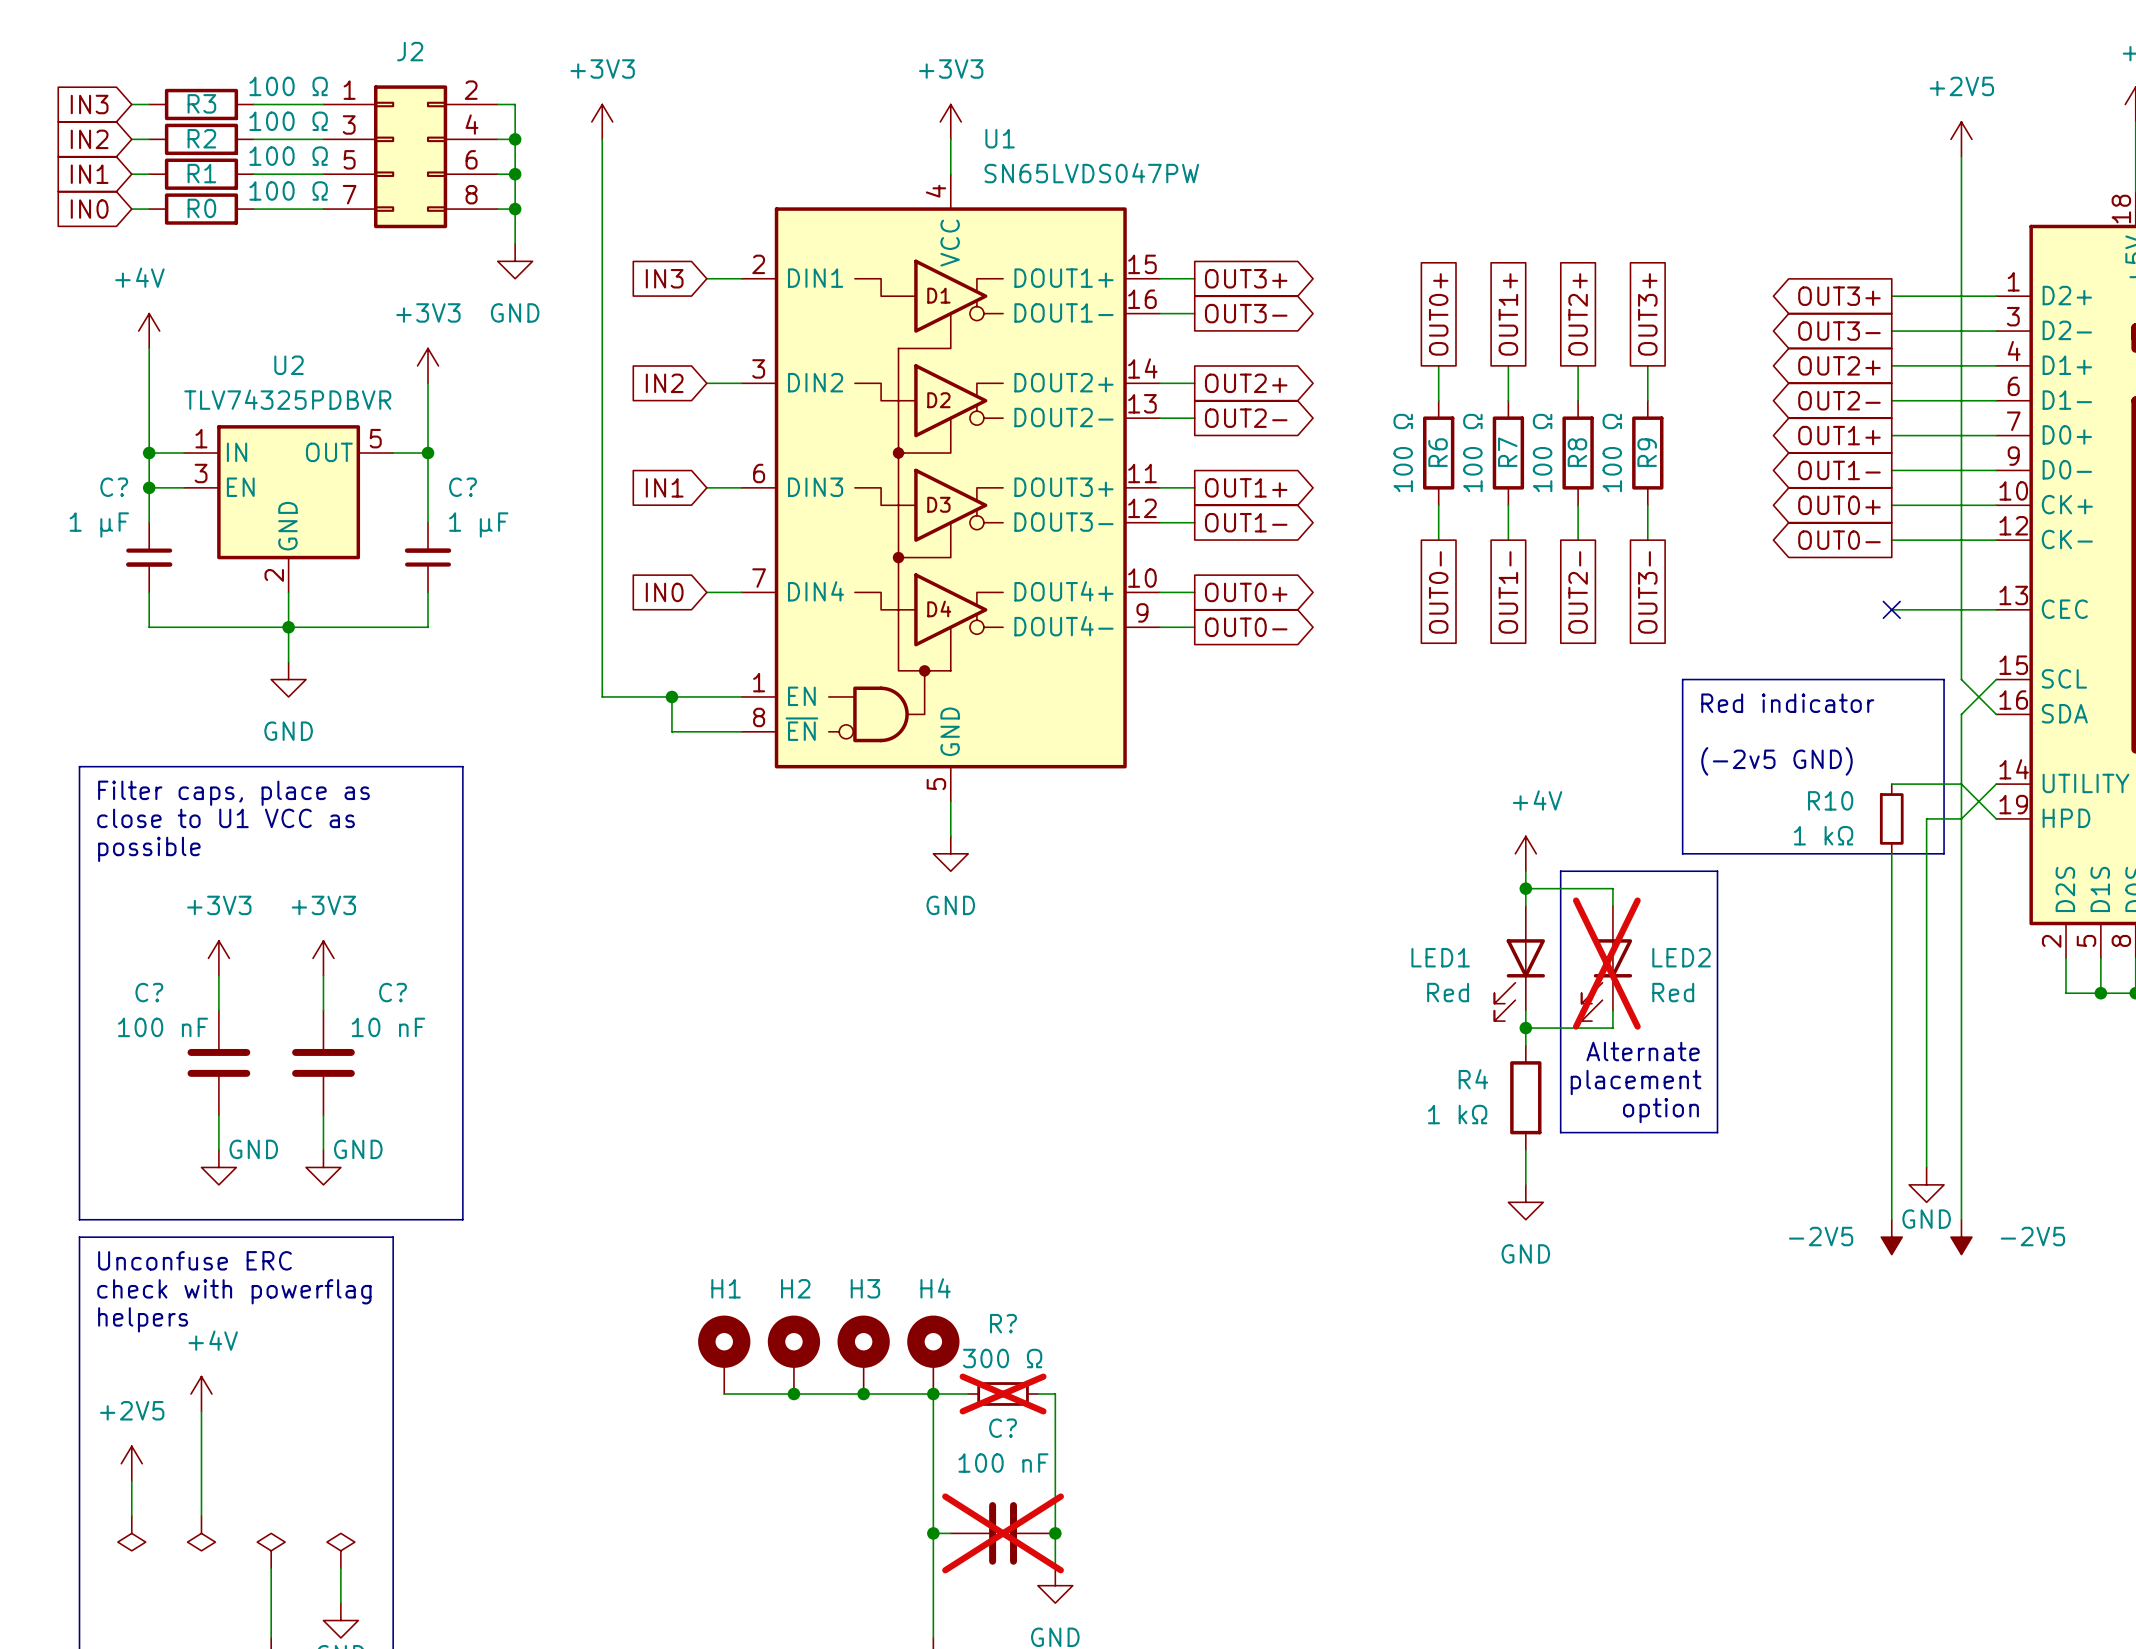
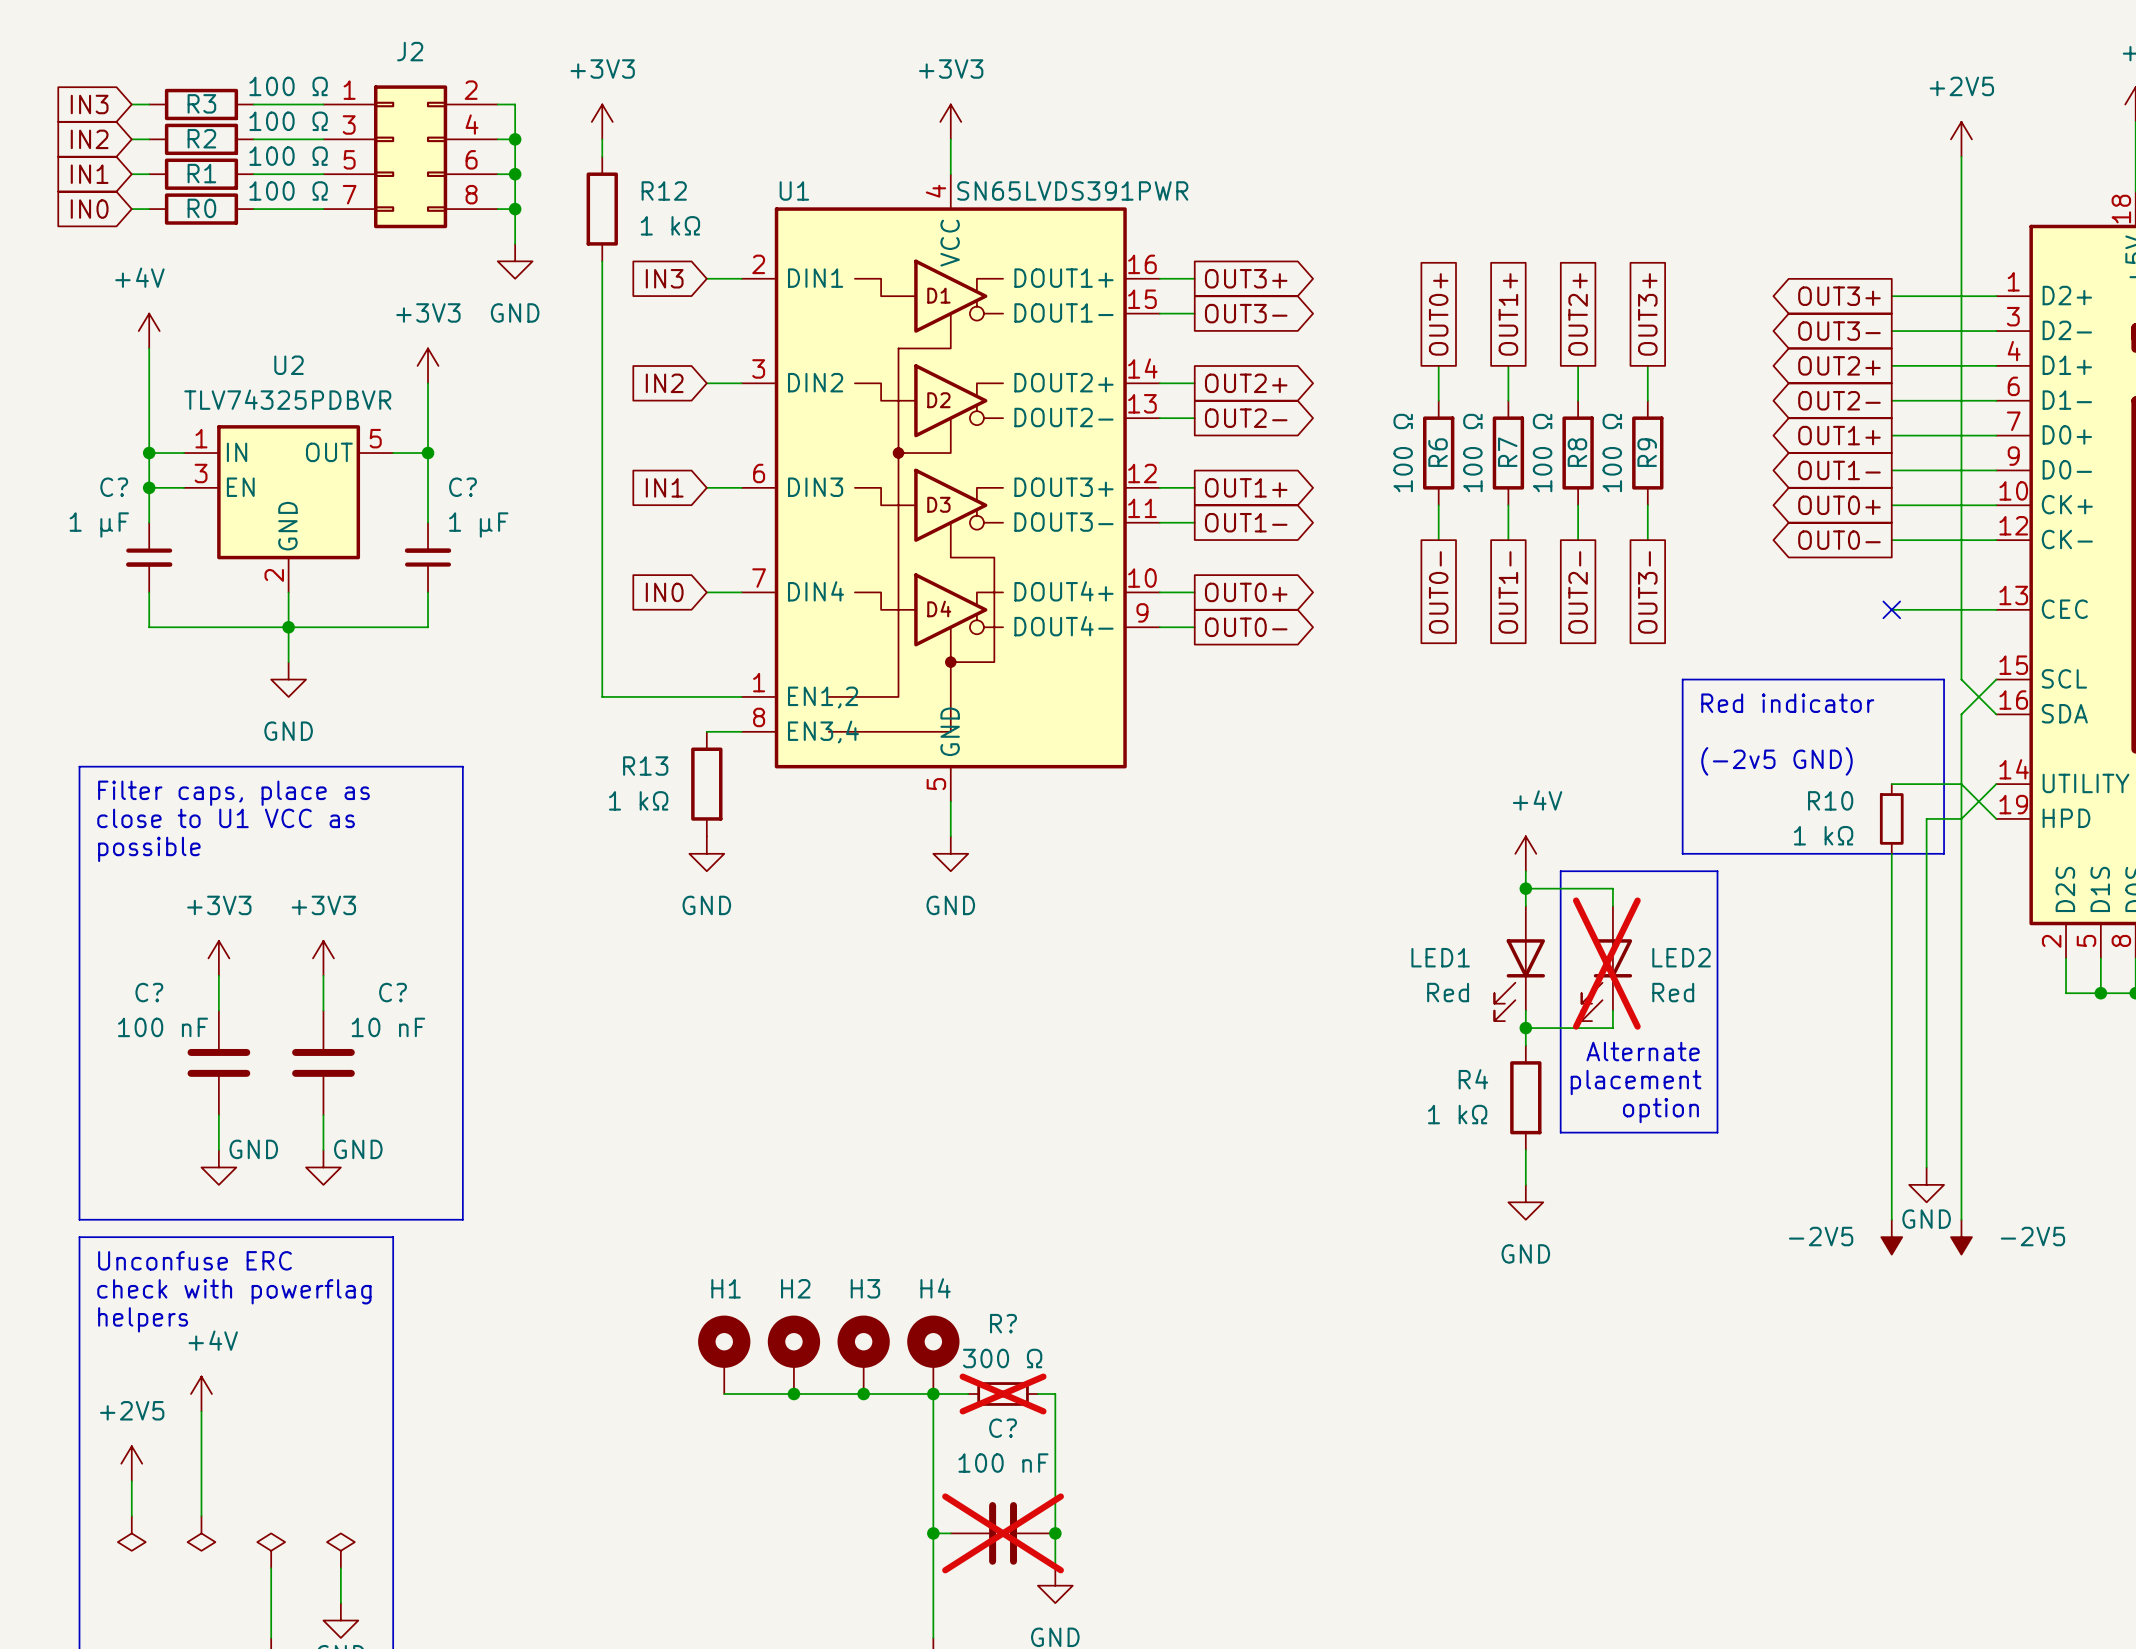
U1 name position: U1 (1000, 138) -> U1 (794, 190)
wire: (602, 156) (602, 261) -> none
U1 value: SN65LVDS047PW (1091, 173) -> SN65LVDS391PWR (1072, 190)
U1 symbol: [741, 174, 1160, 802] -> [741, 174, 1160, 802]
R12: none -> 1 kΩ (602, 209)
wire: (671, 696) (671, 731) (706, 731) -> none
junction: (671, 696) -> none
R13: none -> 1 kΩ (706, 784)
power symbol: none -> GND (706, 853)

